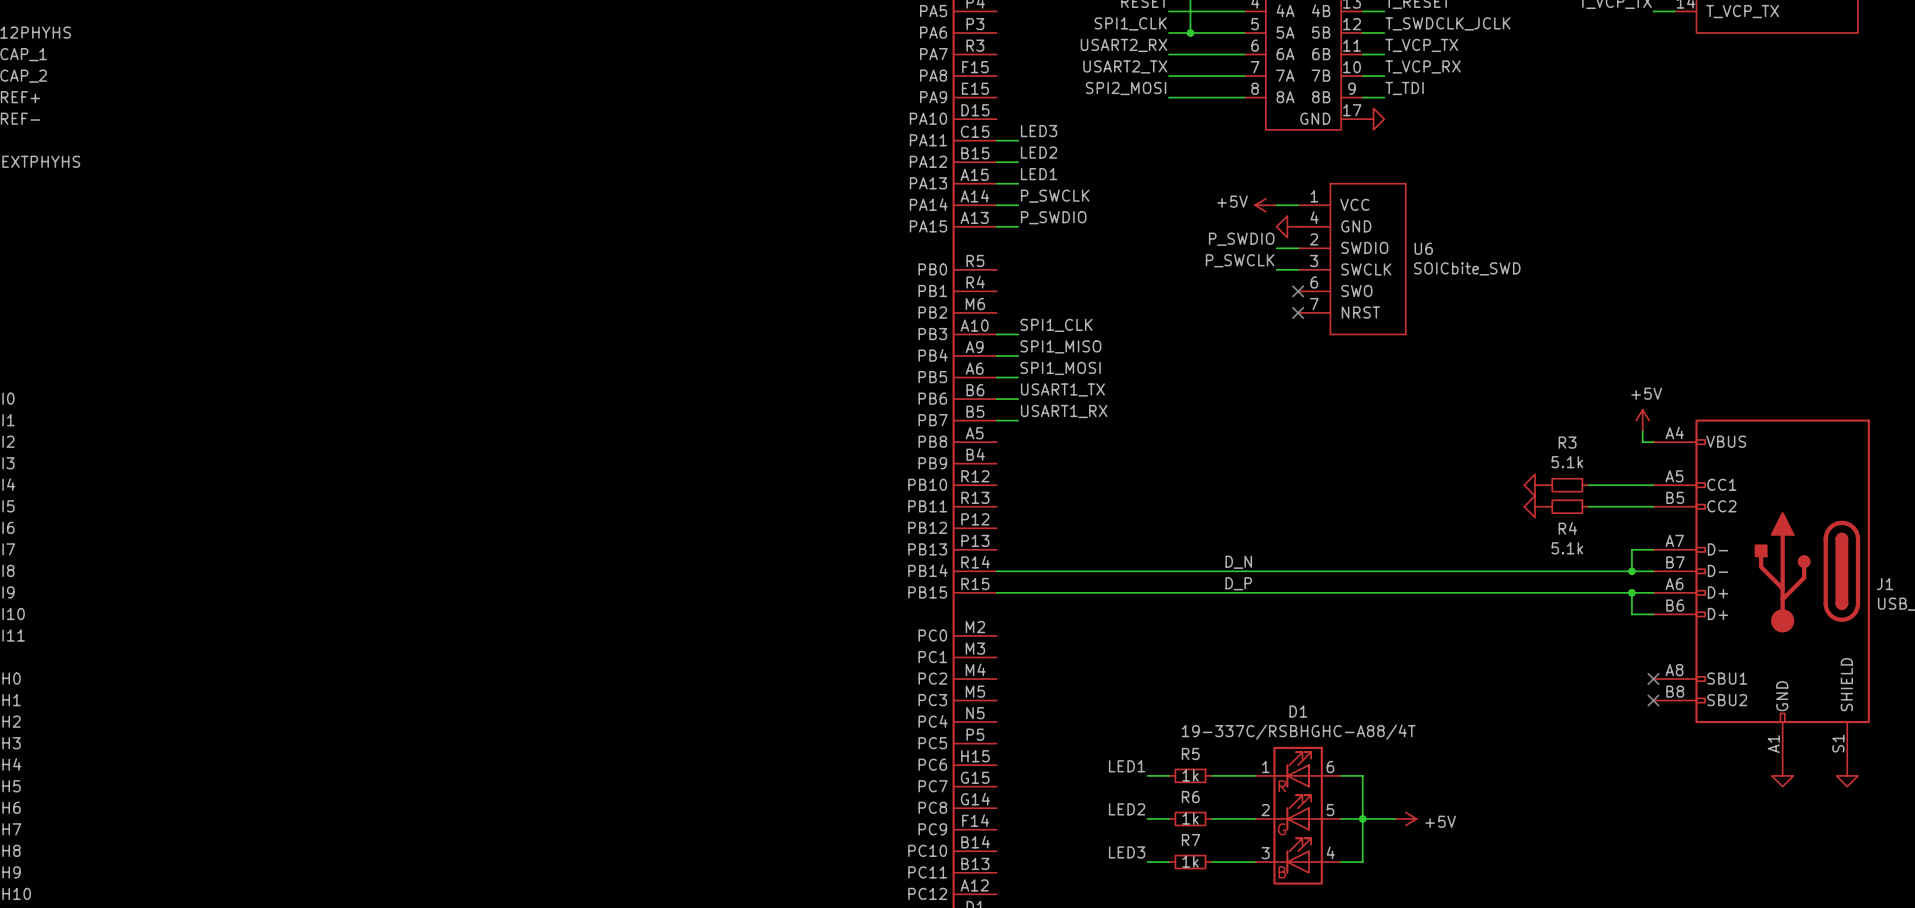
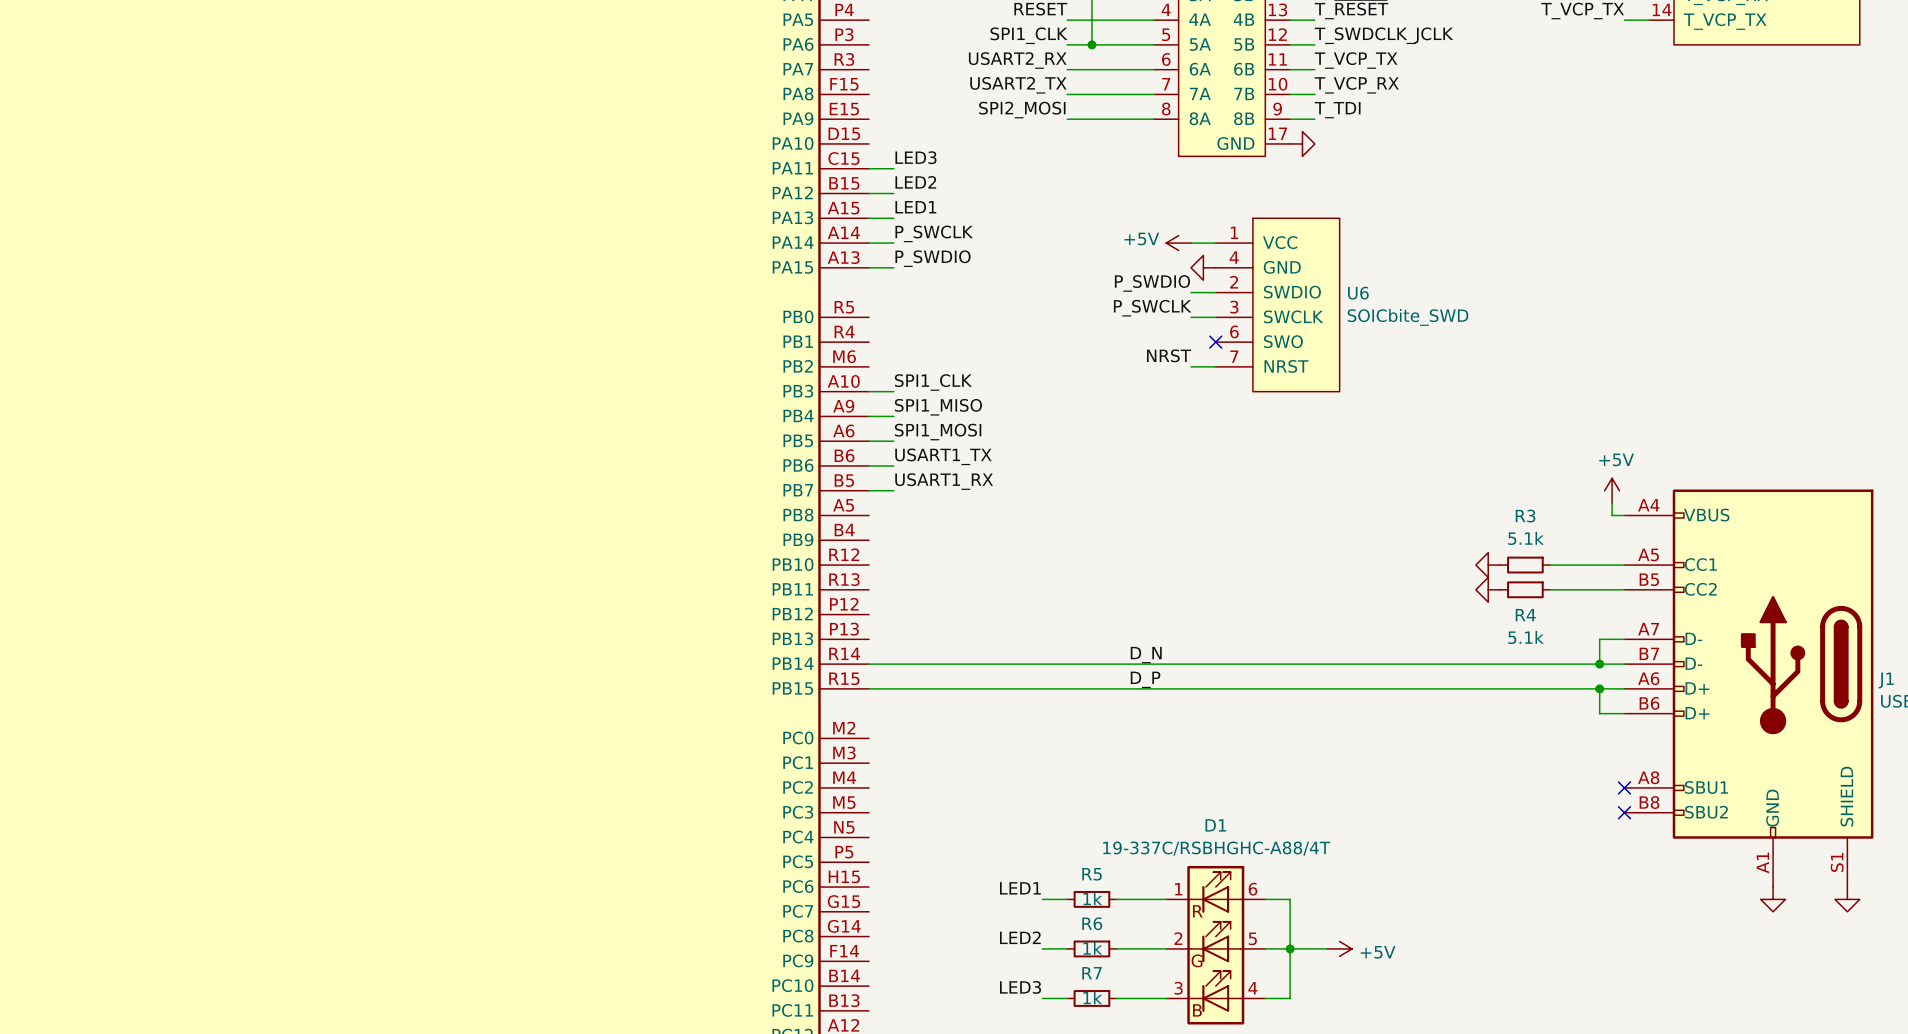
label: none -> NRST (1169, 355)
wire: none -> (1191, 366) (1215, 366)
no-connect mark: (1298, 312) -> none

